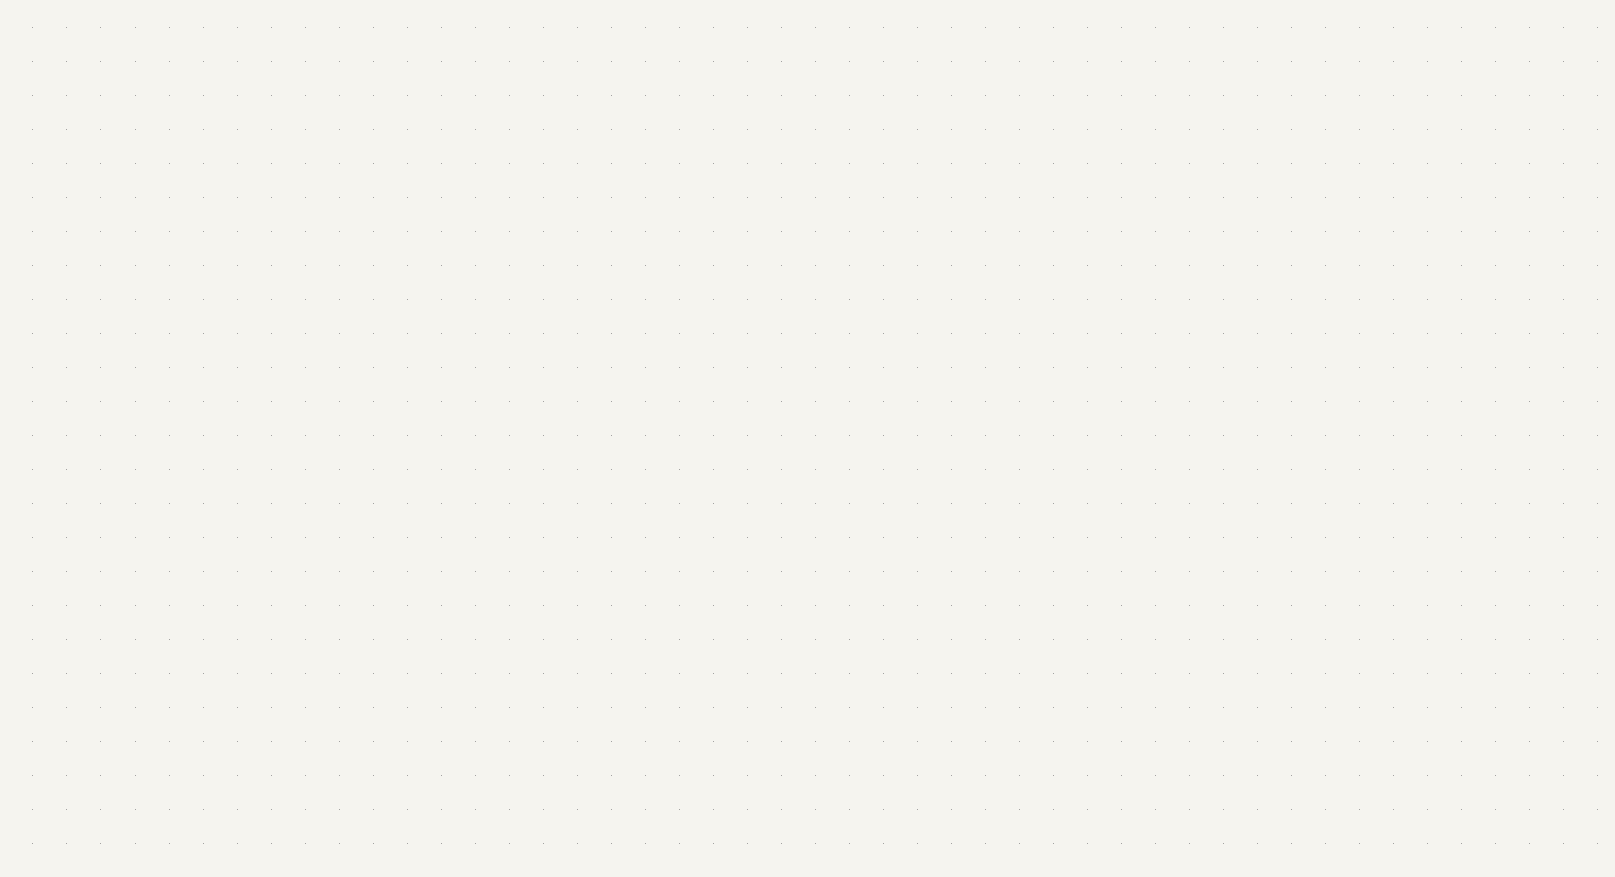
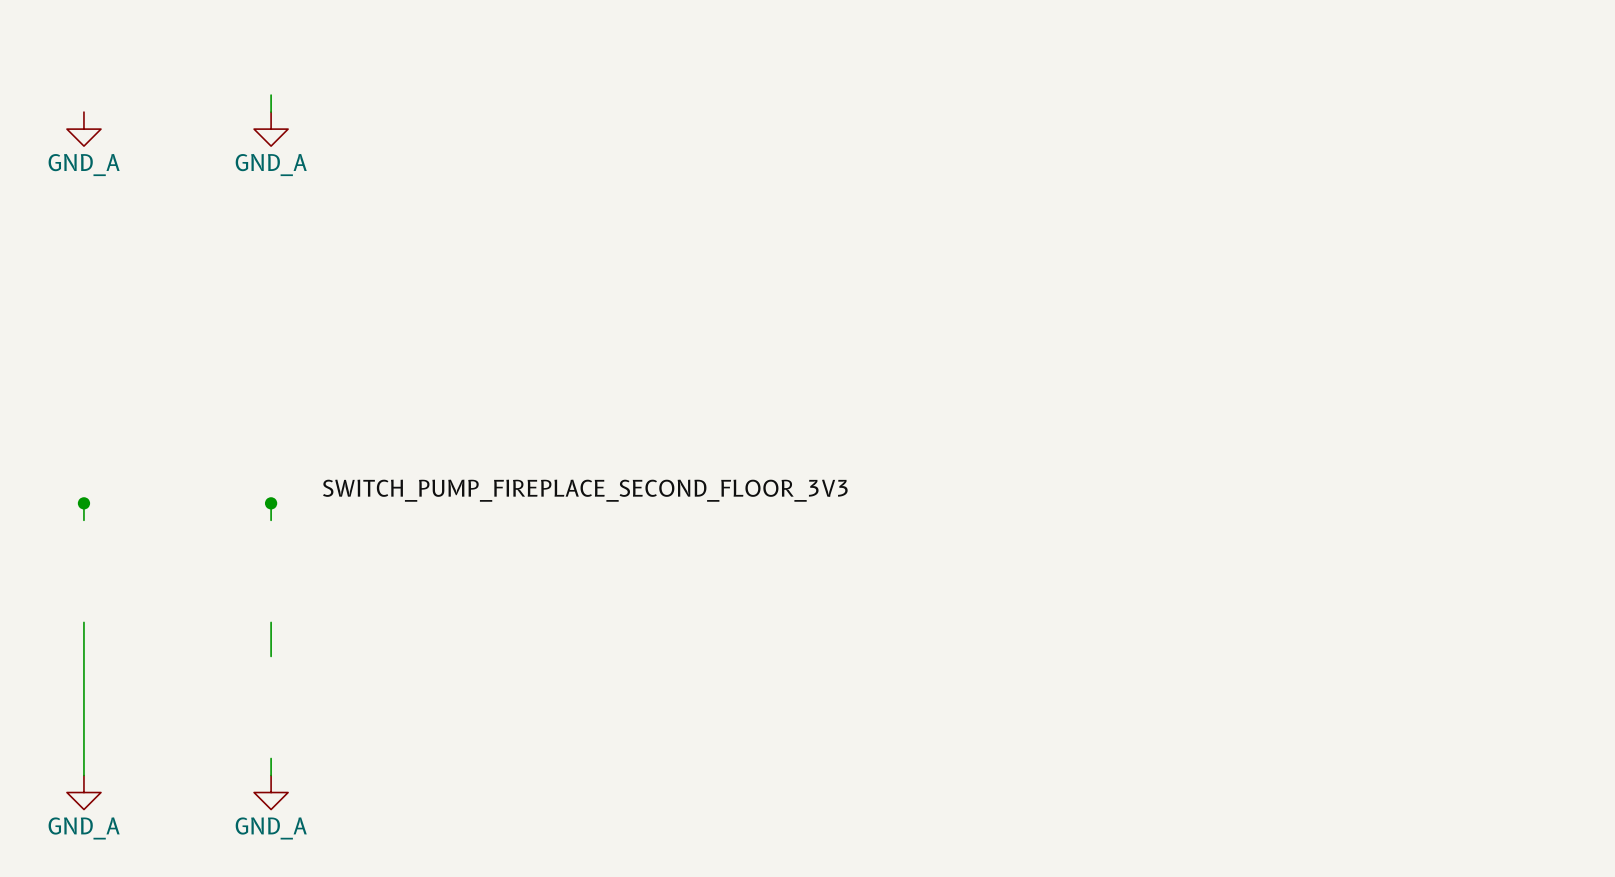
wire: none -> (271, 95) (271, 112)
power symbol: none -> GND_A (83, 129)
power symbol: none -> GND_A (271, 129)
label: none -> SWITCH_PUMP_FIREPLACE_SECOND_FLOOR_3V3 (585, 490)
wire: none -> (83, 503) (83, 520)
junction: none -> (83, 503)
wire: none -> (271, 503) (271, 520)
junction: none -> (271, 503)
wire: none -> (83, 622) (83, 775)
wire: none -> (271, 622) (271, 656)
wire: none -> (271, 758) (271, 775)
power symbol: none -> GND_A (83, 792)
power symbol: none -> GND_A (271, 792)

